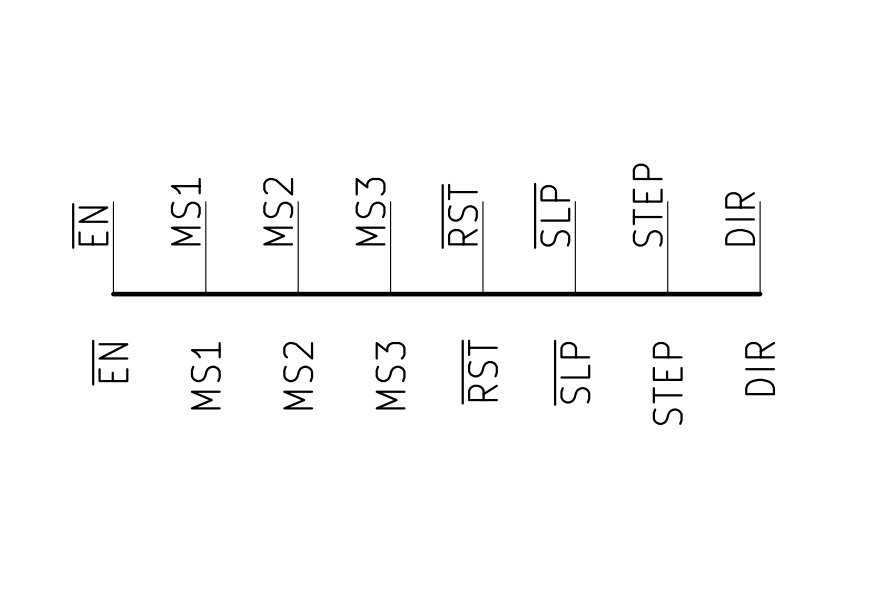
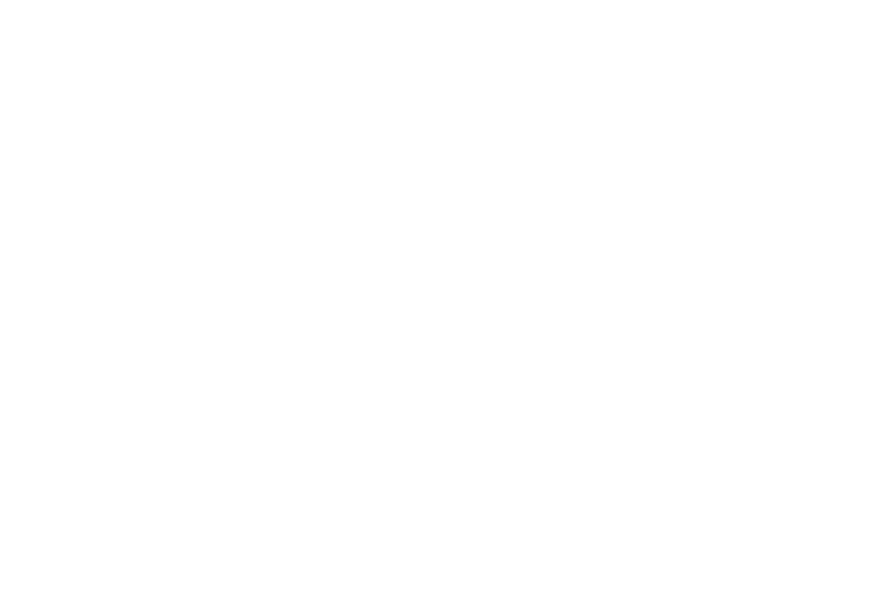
part: (436, 249) -> none

